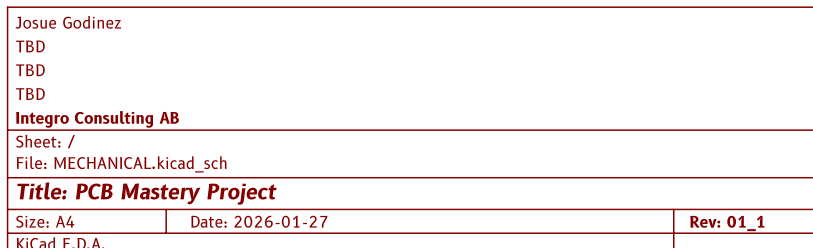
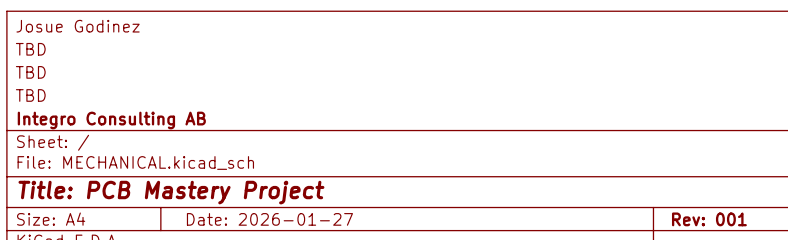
title block: Rev: 01_1 (727, 223) -> Rev: 001 (709, 219)

